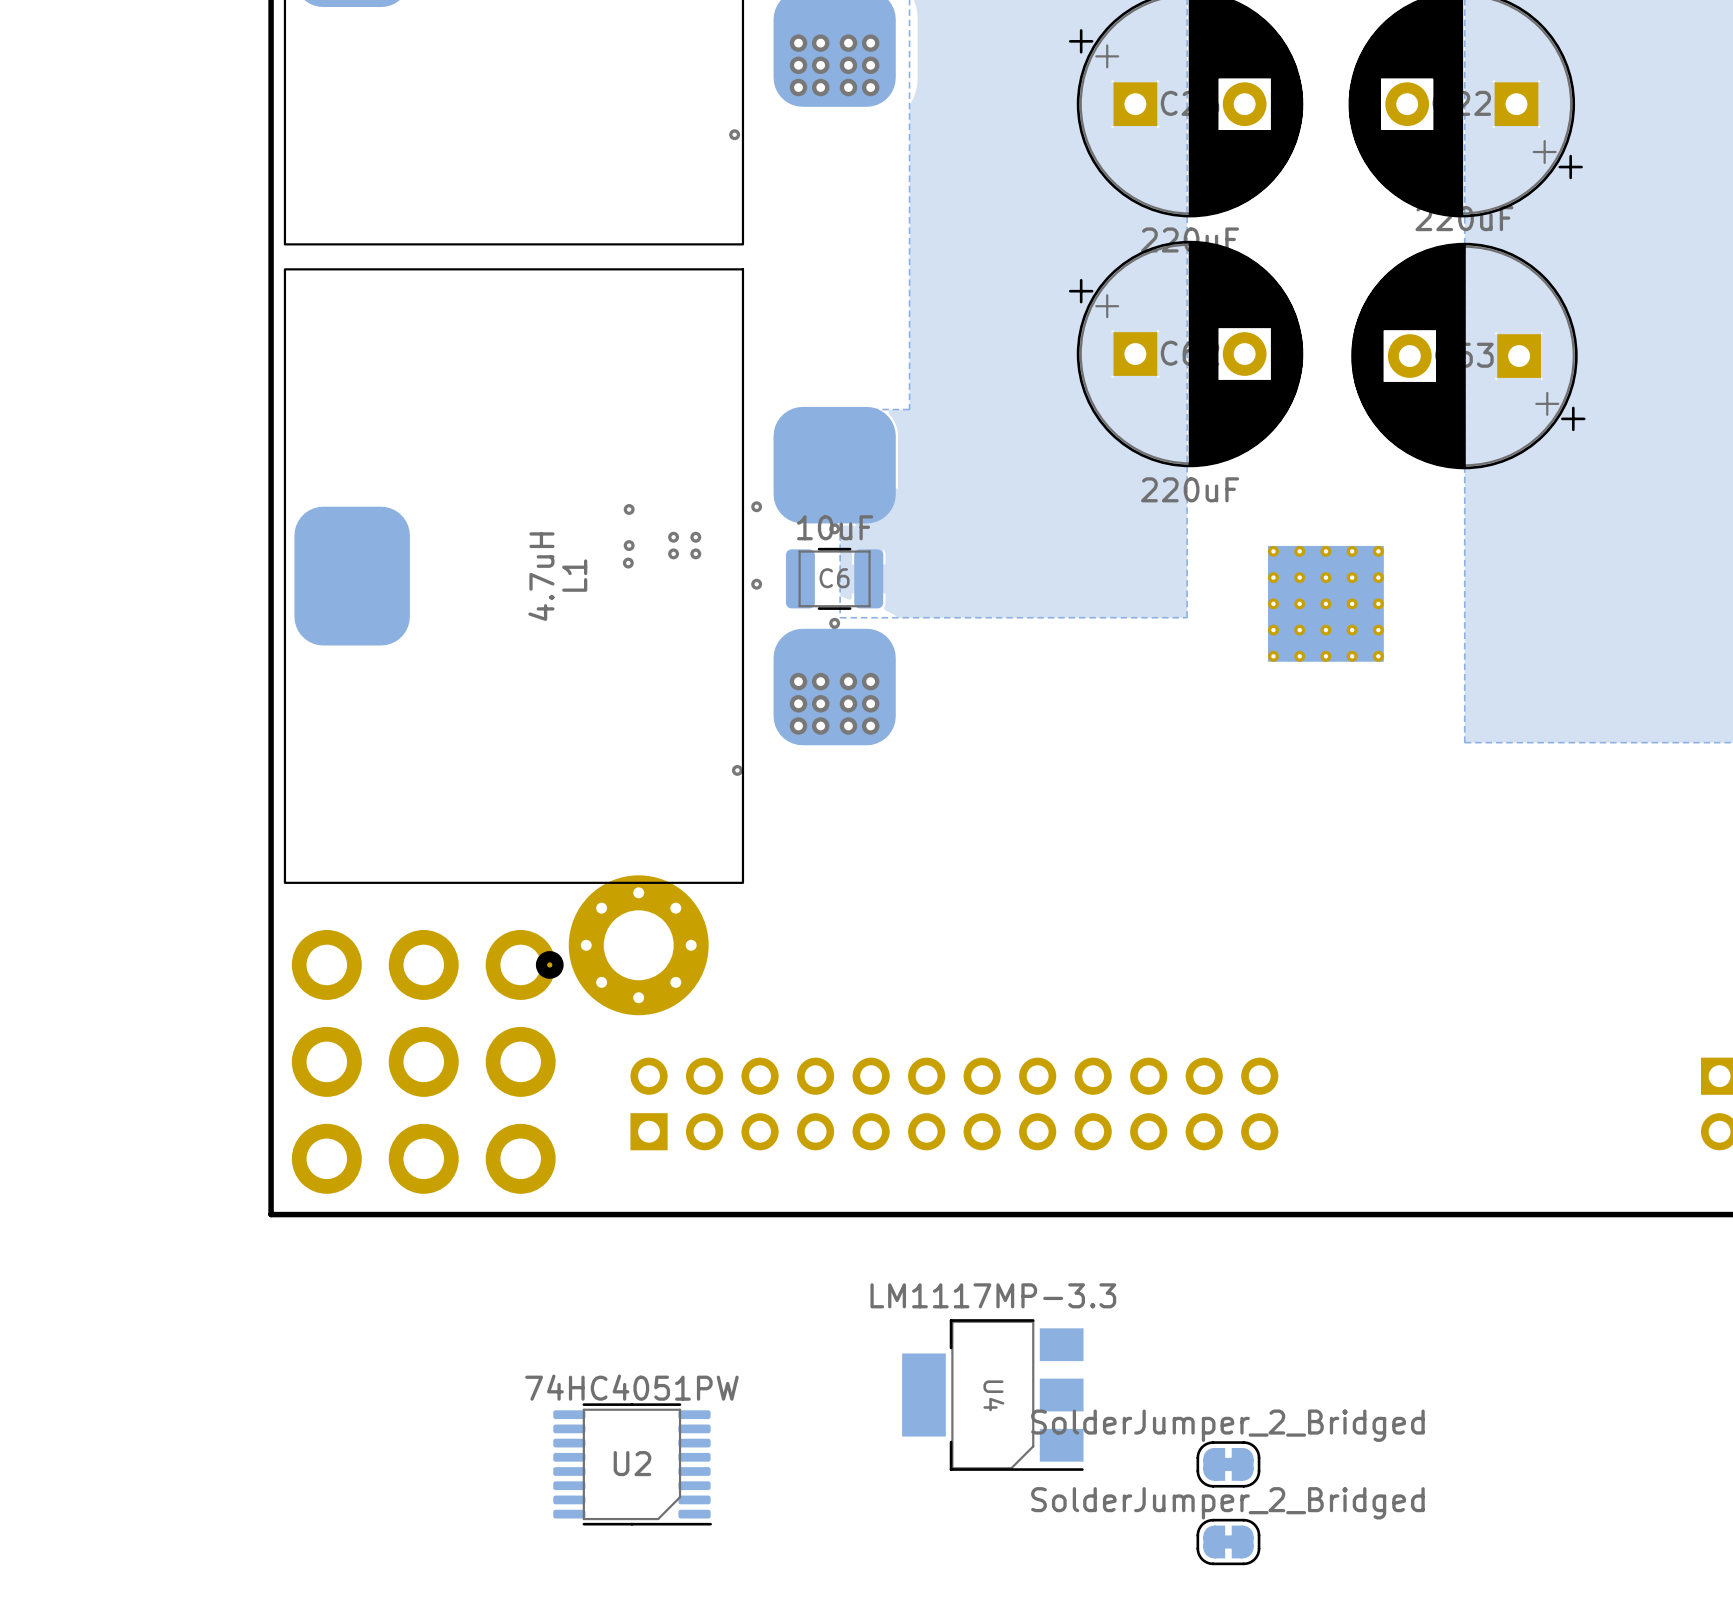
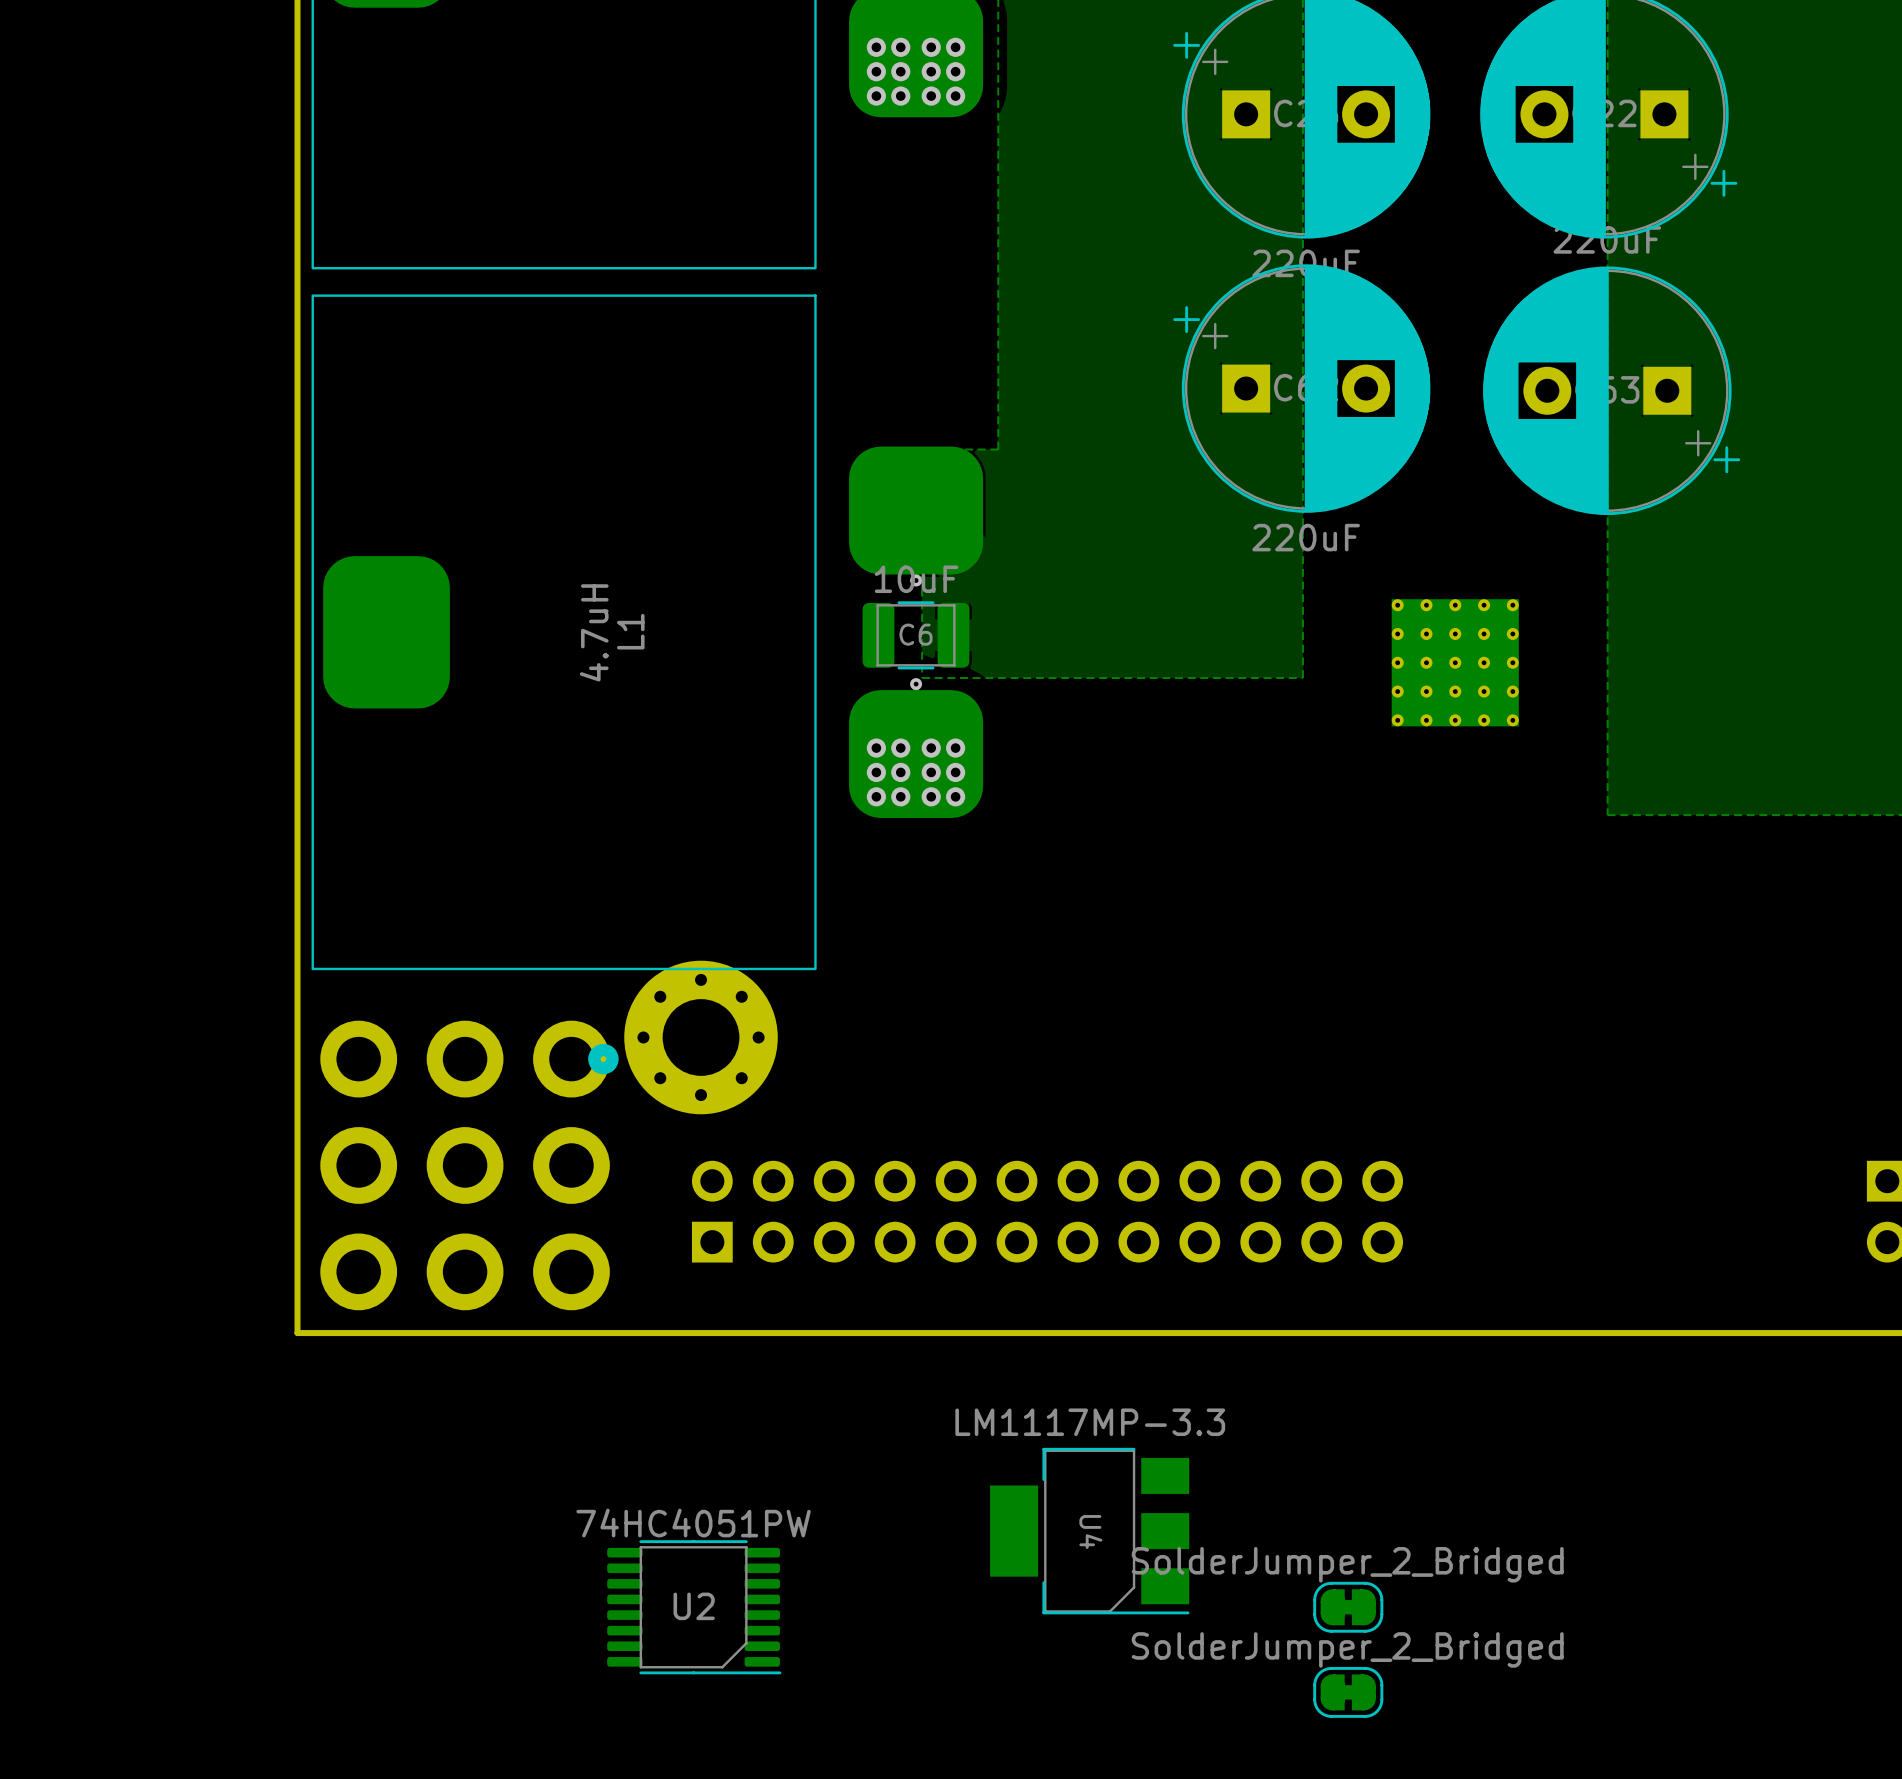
via: (734, 134) -> none
via: (756, 506) -> none
via: (629, 509) -> none
via: (673, 537) -> none
via: (695, 537) -> none
via: (629, 545) -> none
via: (673, 553) -> none
via: (695, 553) -> none
via: (628, 563) -> none
via: (756, 584) -> none
via: (737, 770) -> none

